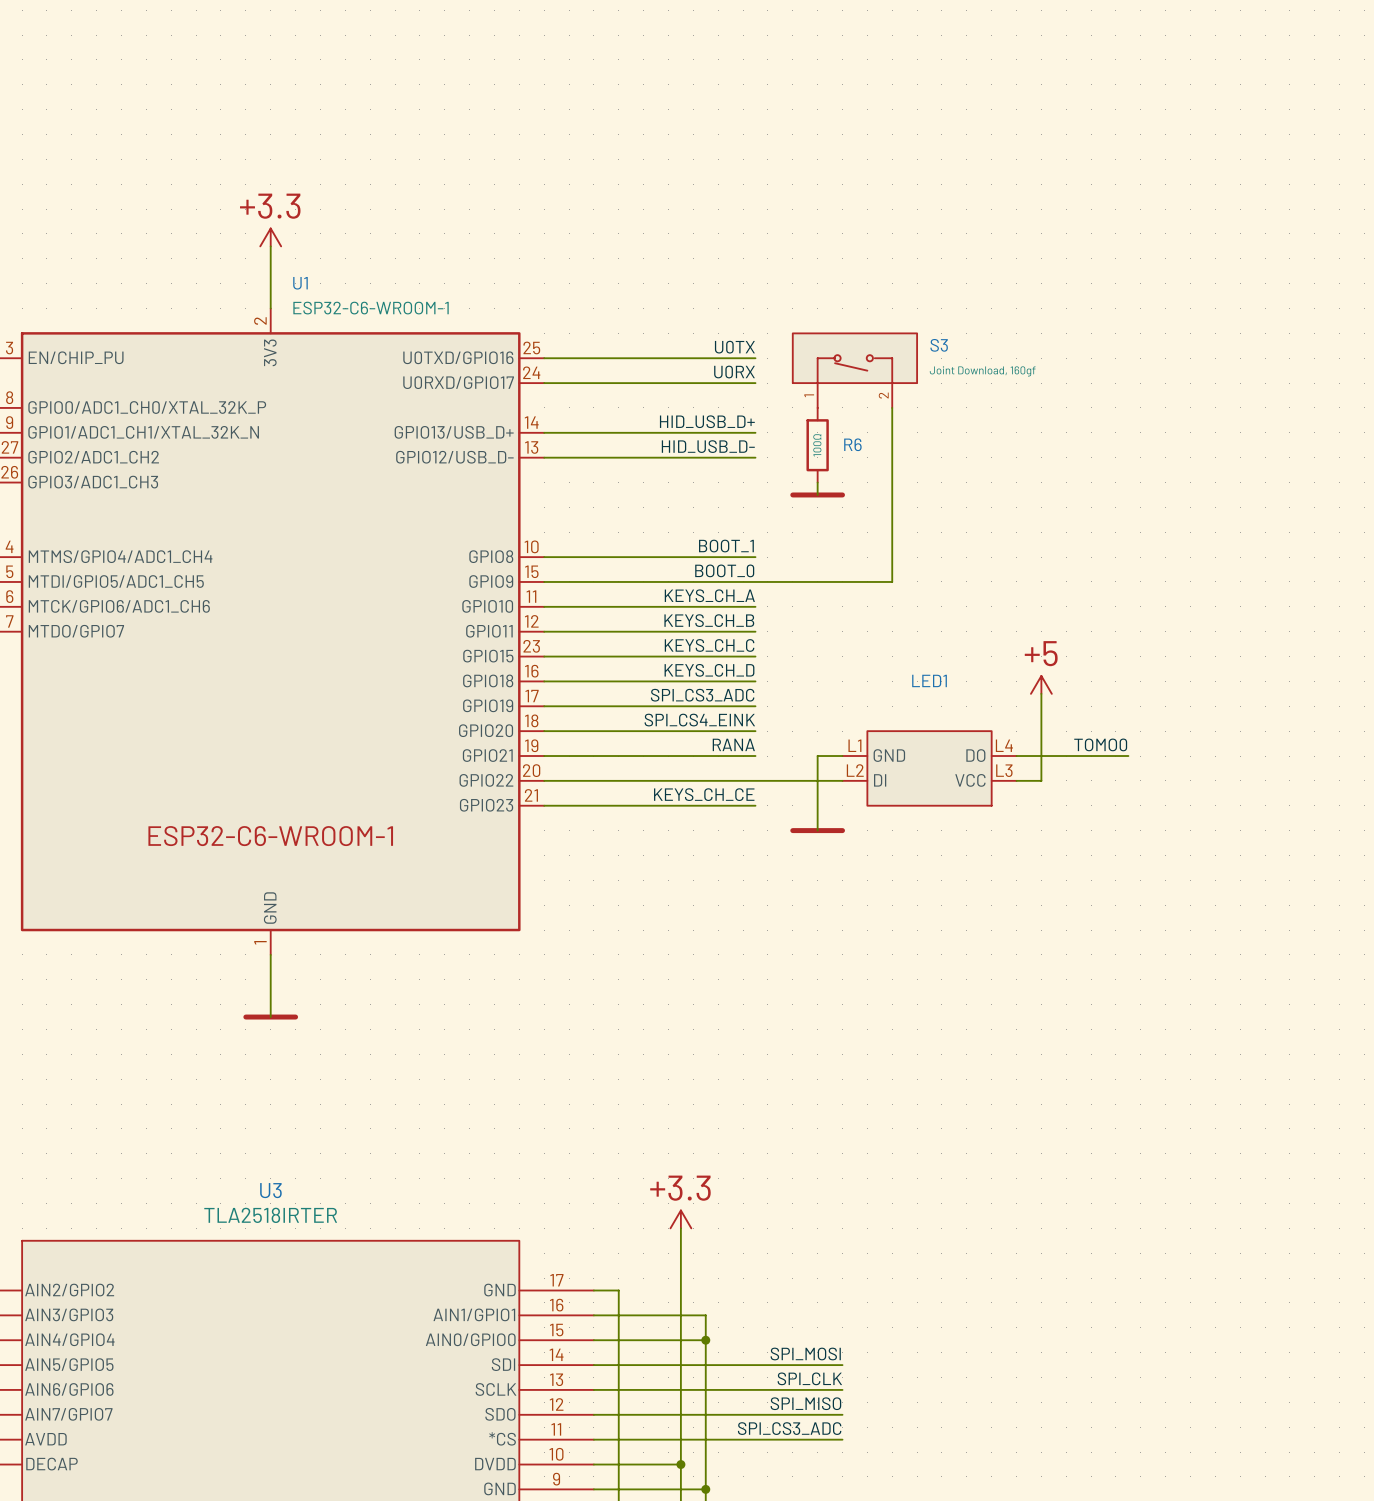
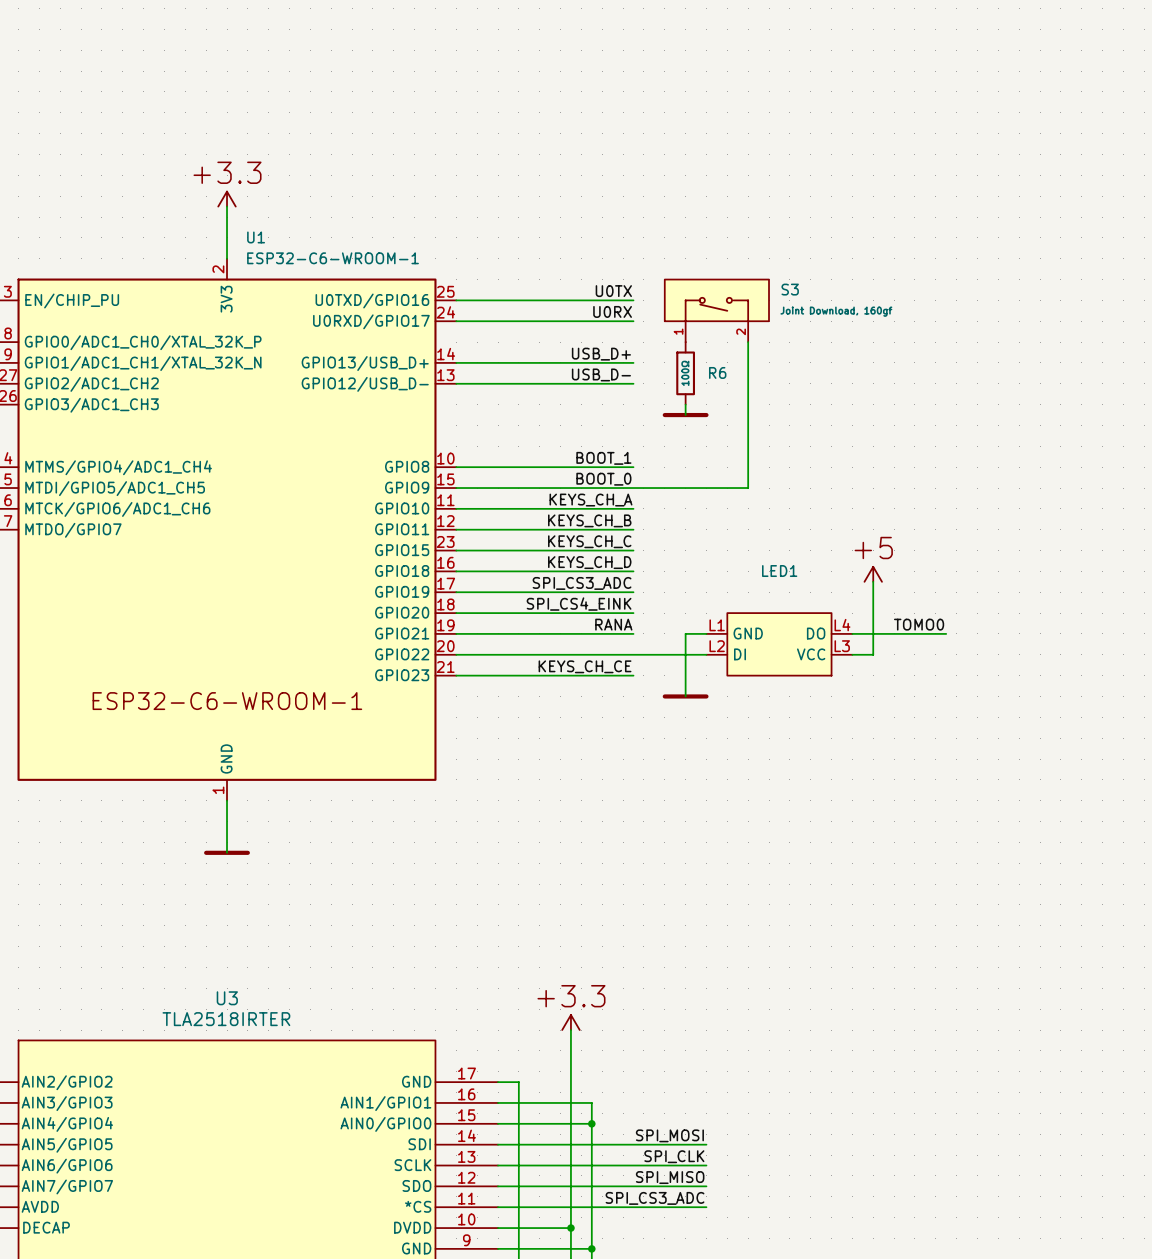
label: HID_USB_D+ (707, 421) -> USB_D+ (601, 354)
label: HID_USB_D- (708, 446) -> USB_D- (601, 374)

